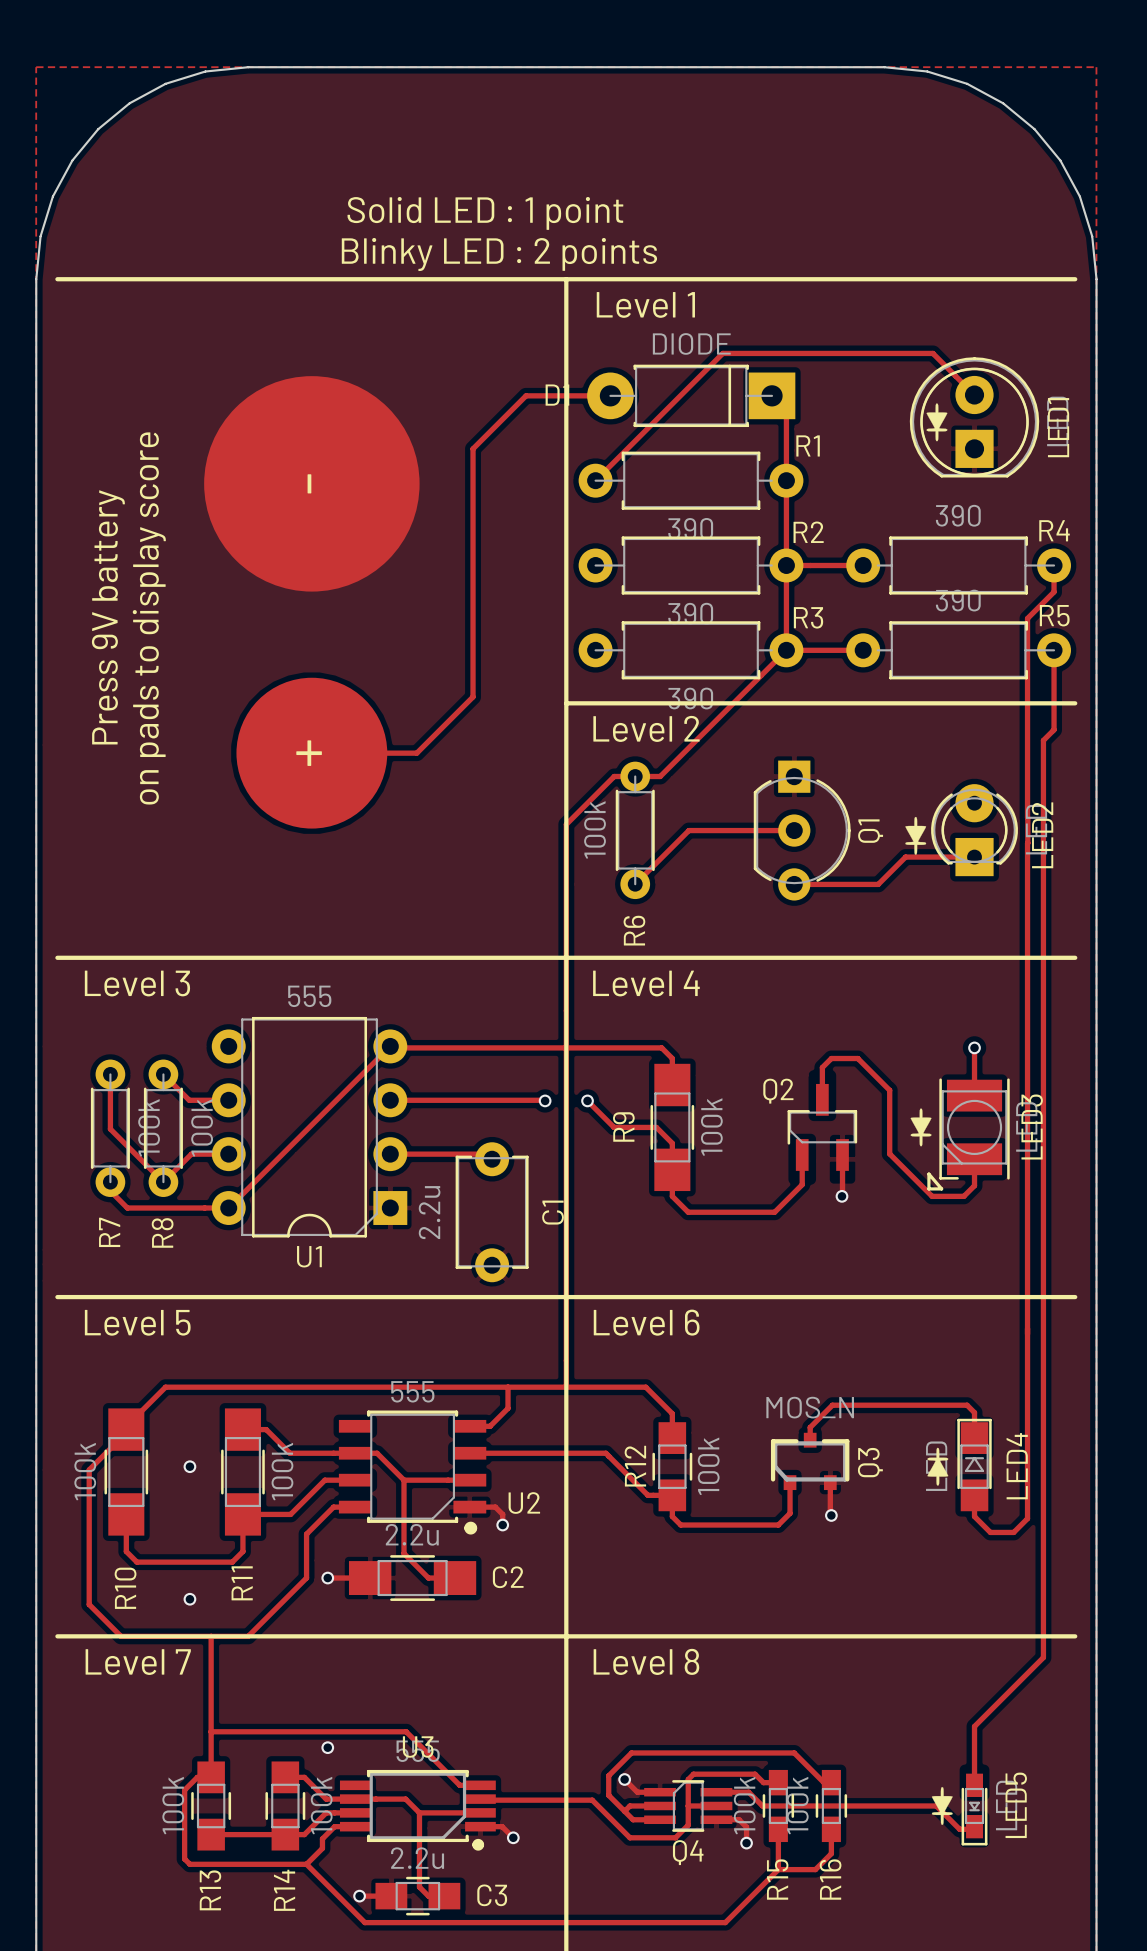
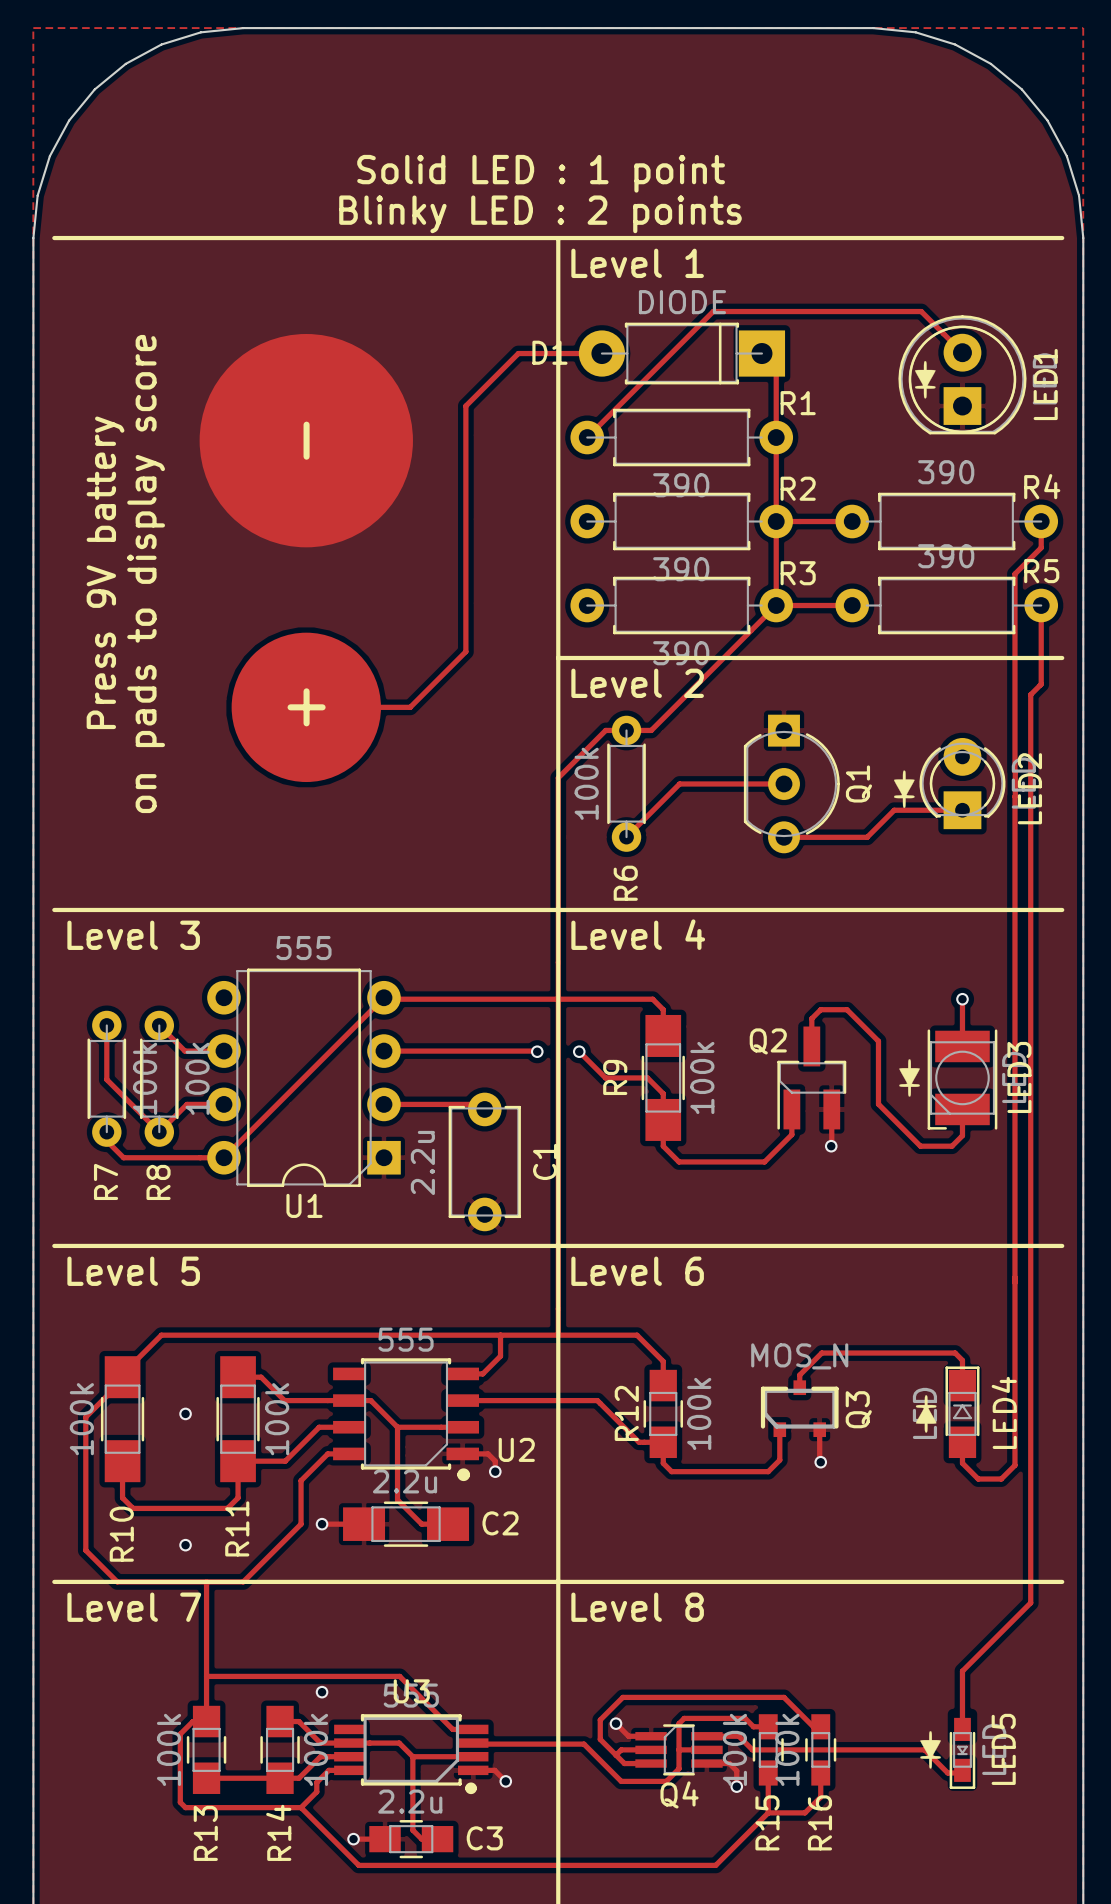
Q2 footprint: [787, 1083, 858, 1171] -> [777, 1026, 847, 1130]
line: (928, 1174) (941, 1188) (928, 1188) (928, 1174) -> none

